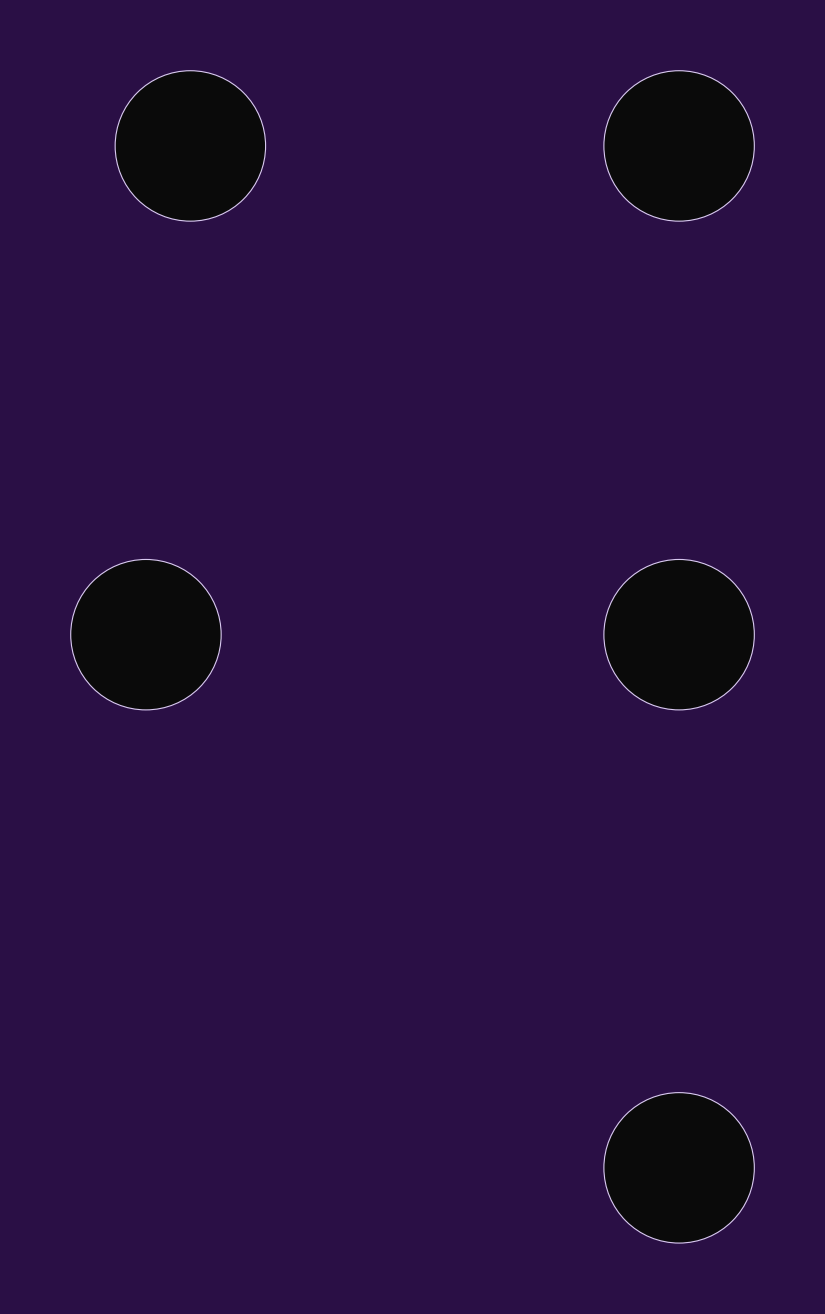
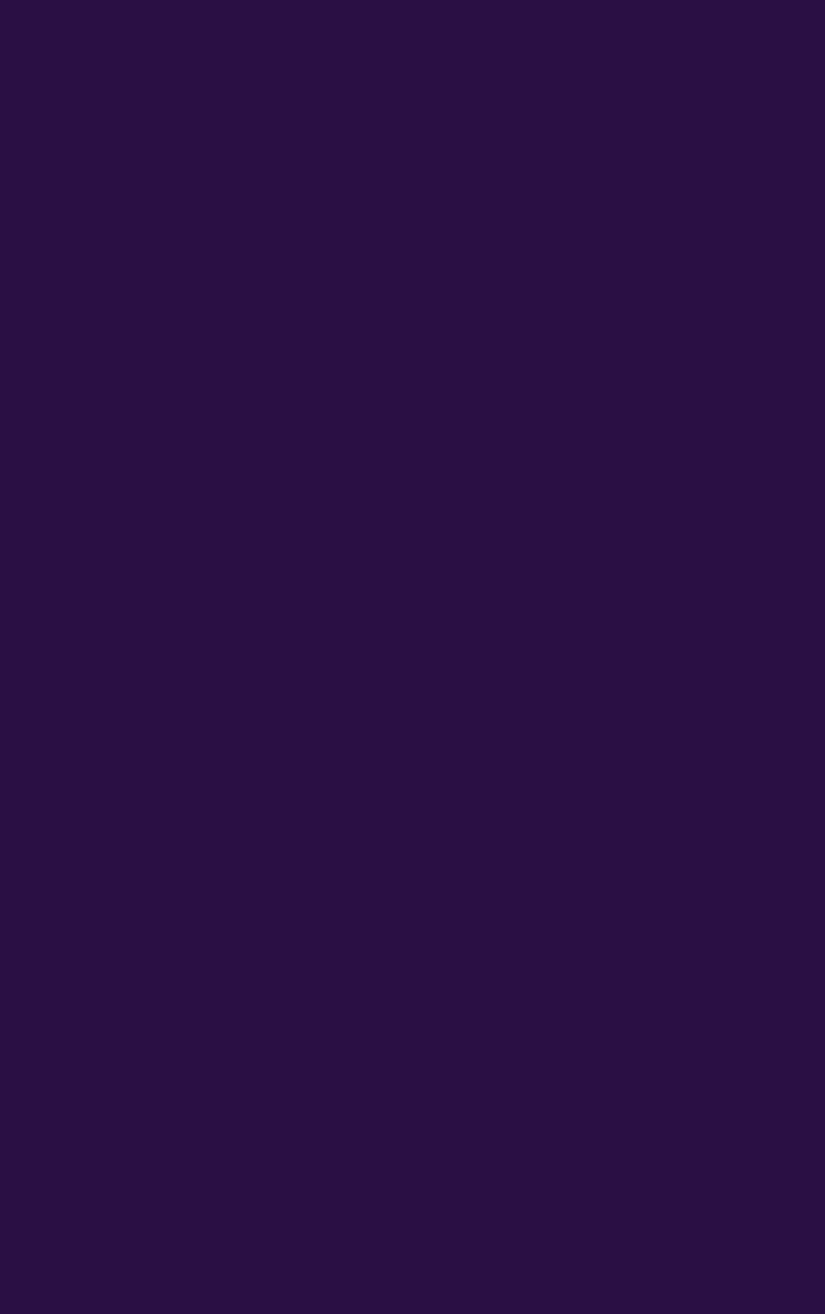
part: (190, 145) -> none
part: (679, 145) -> none
part: (145, 634) -> none
part: (679, 634) -> none
part: (679, 1167) -> none

